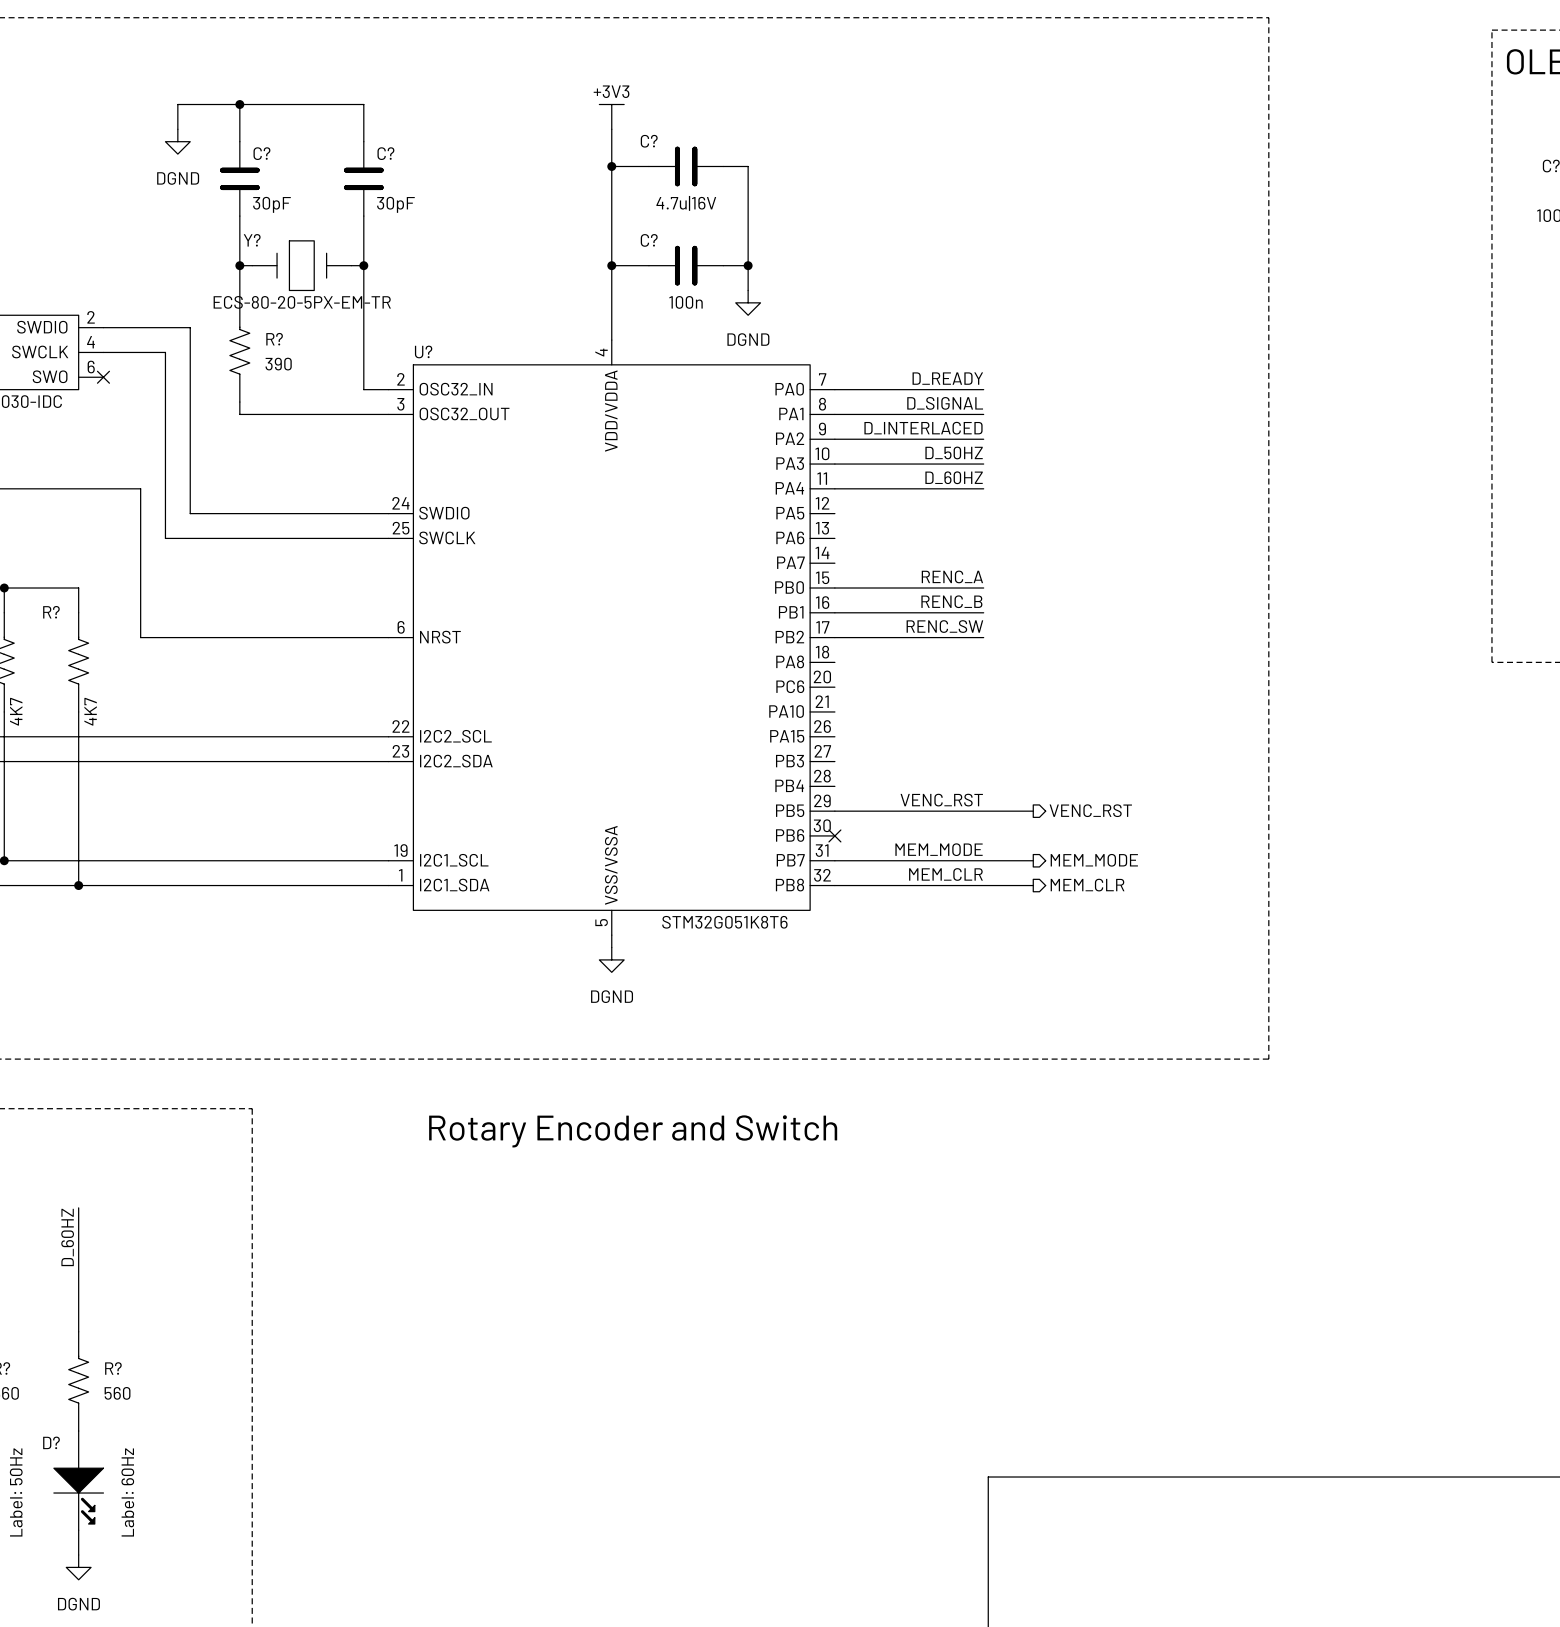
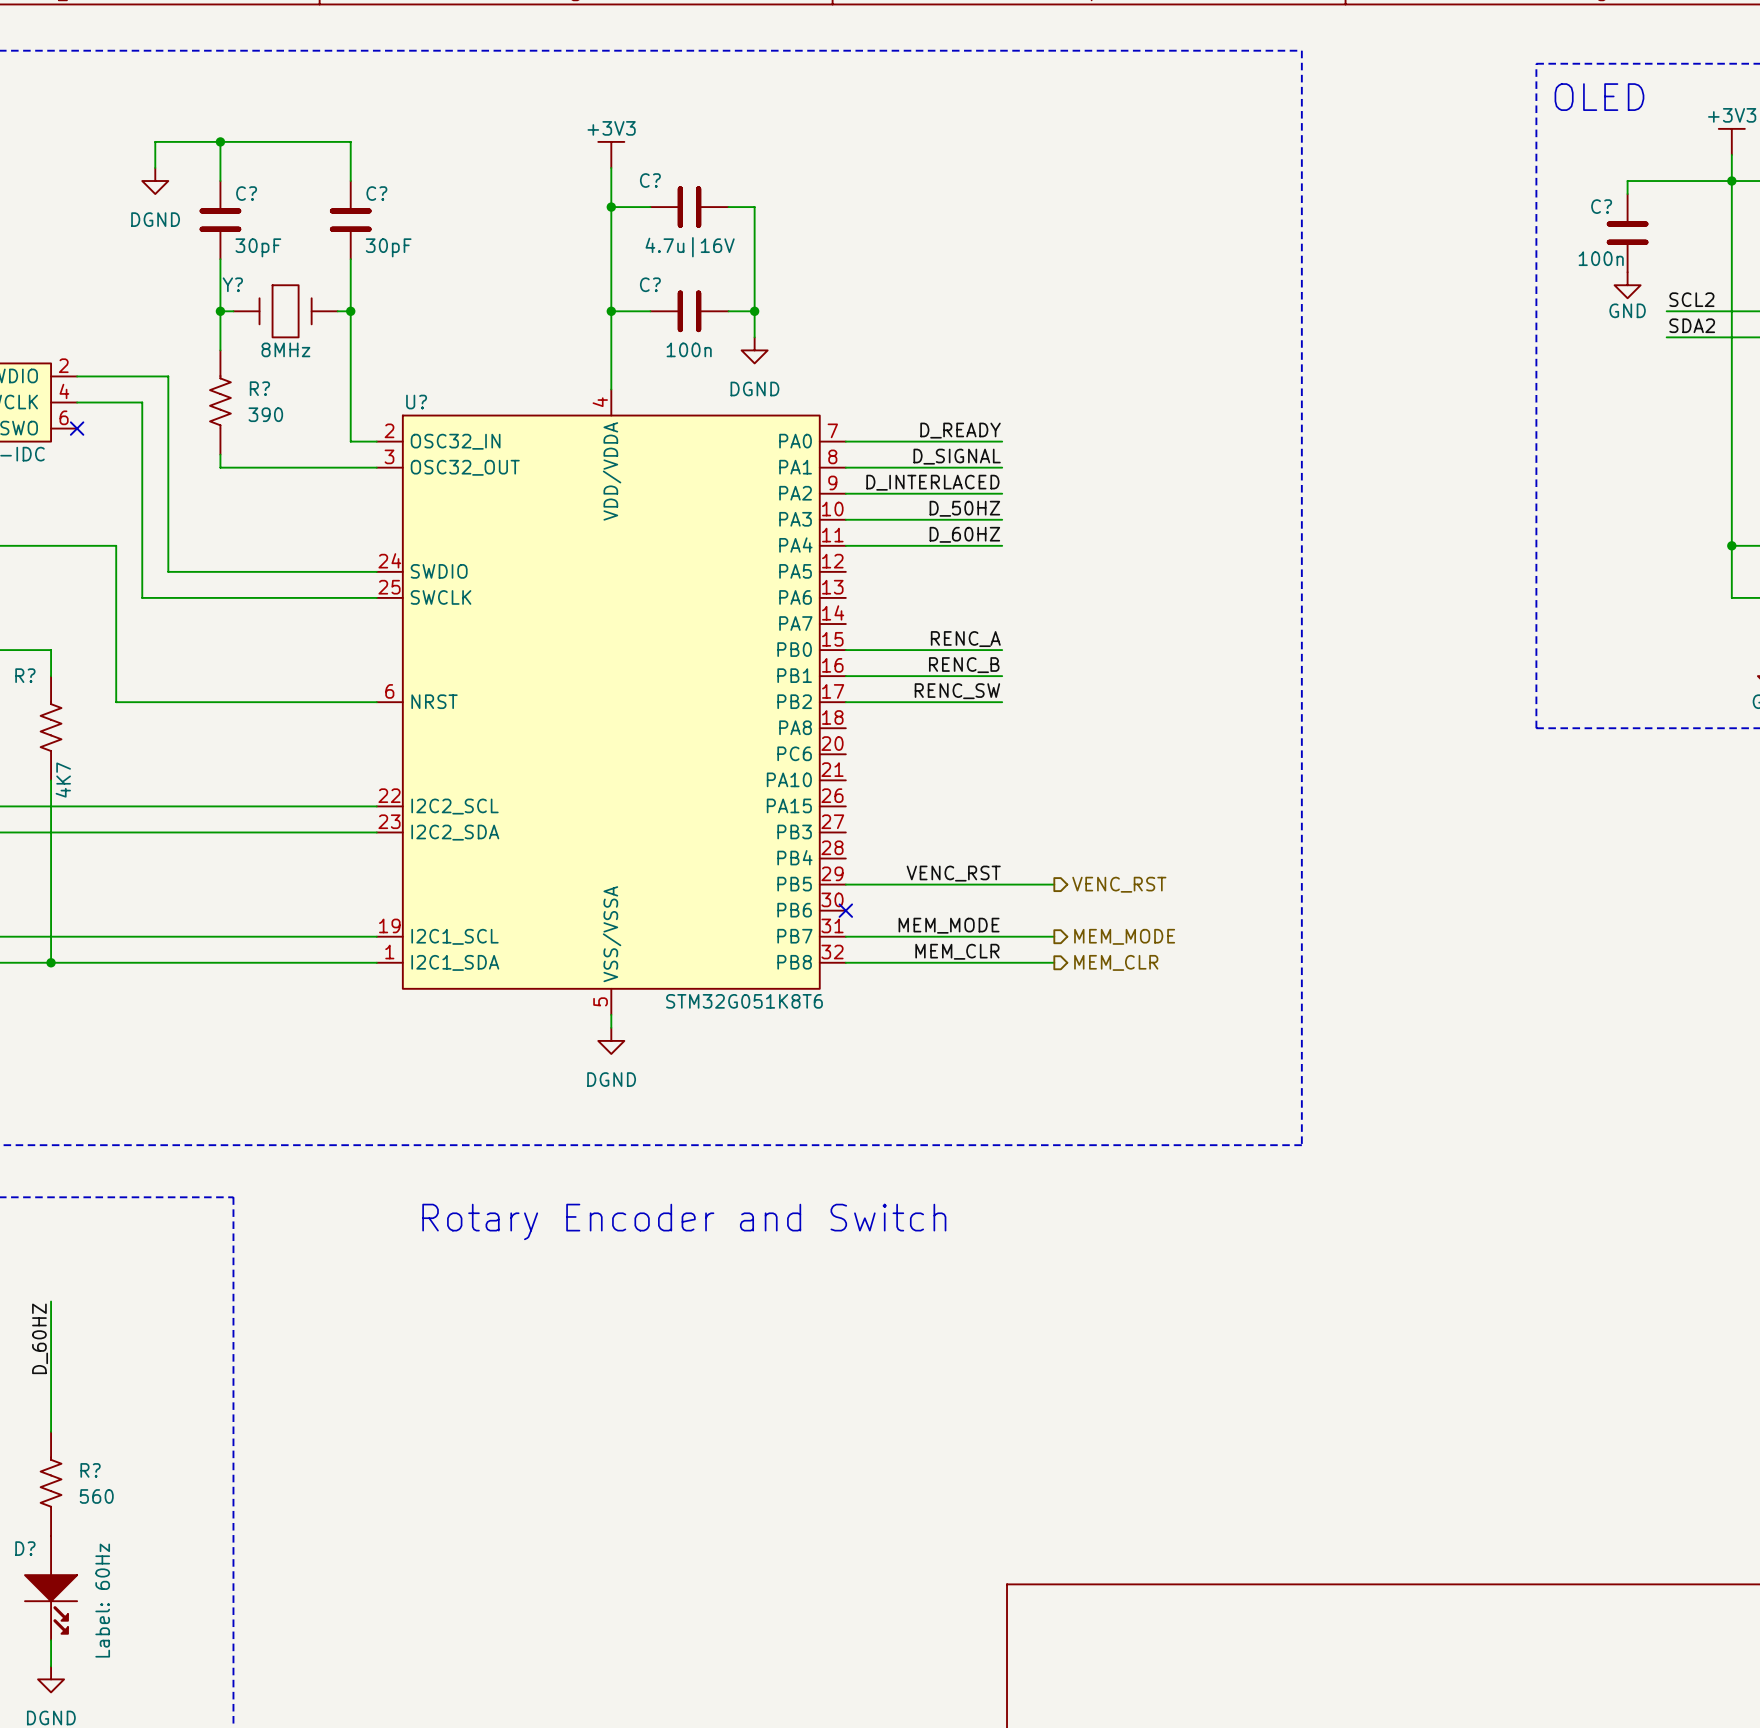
Y? value: ECS-80-20-5PX-EM-TR (302, 302) -> 8MHz (285, 349)

